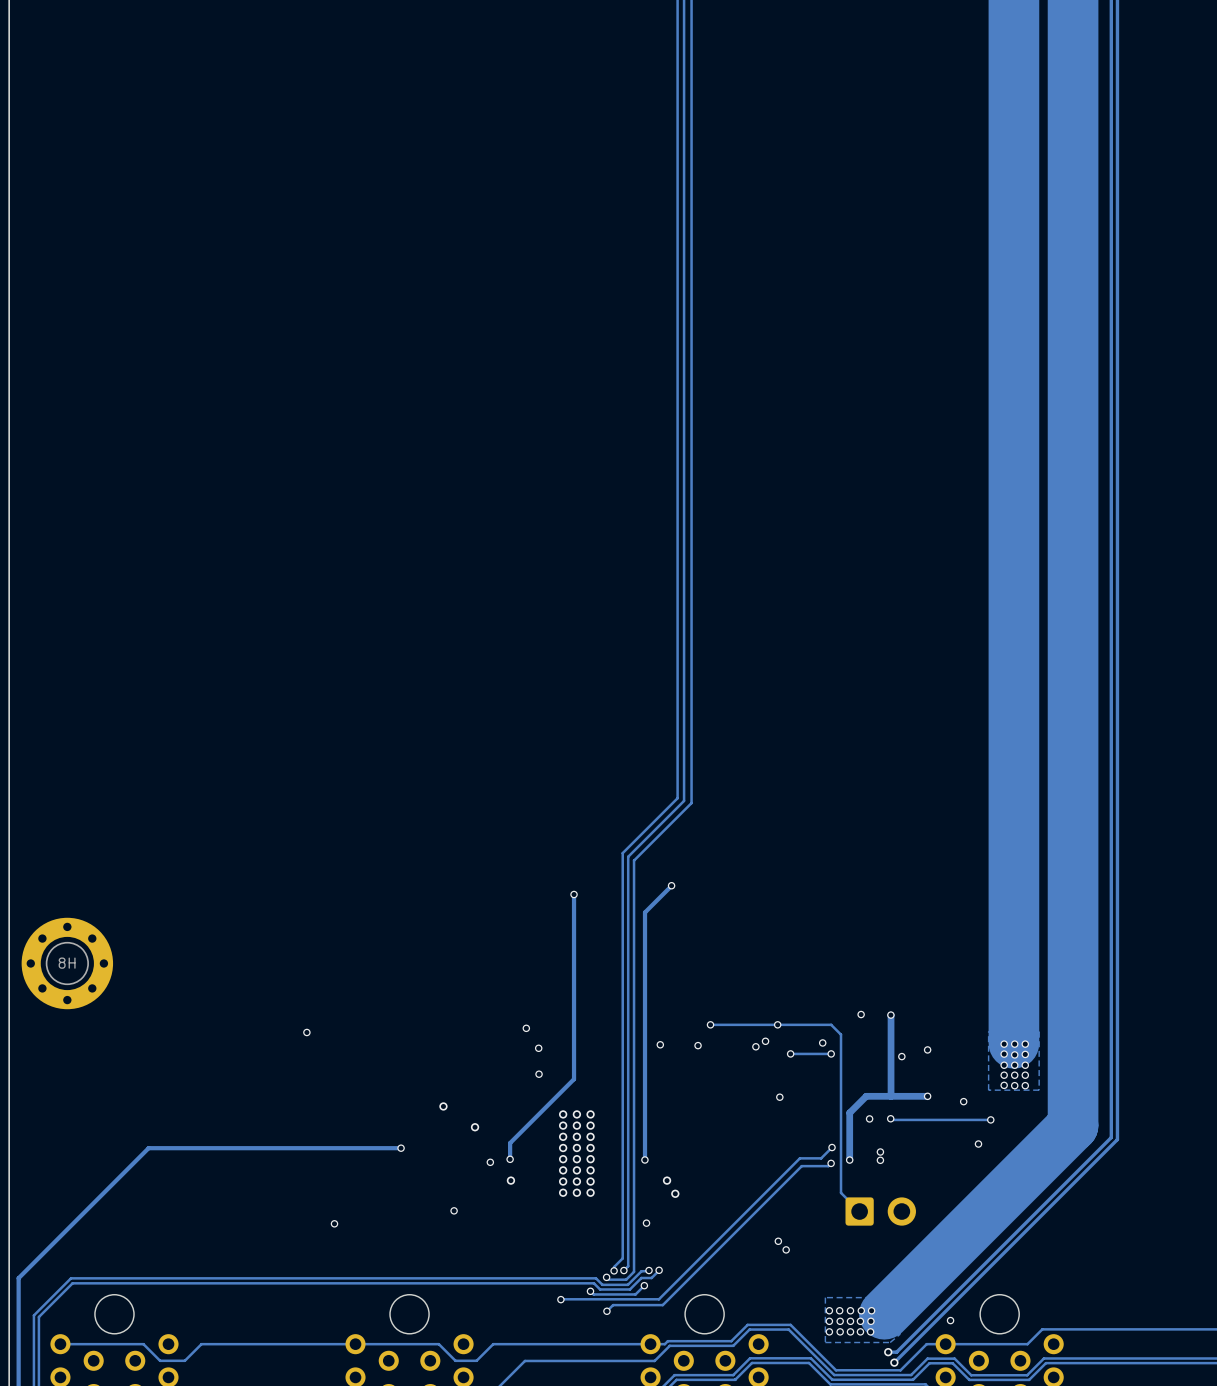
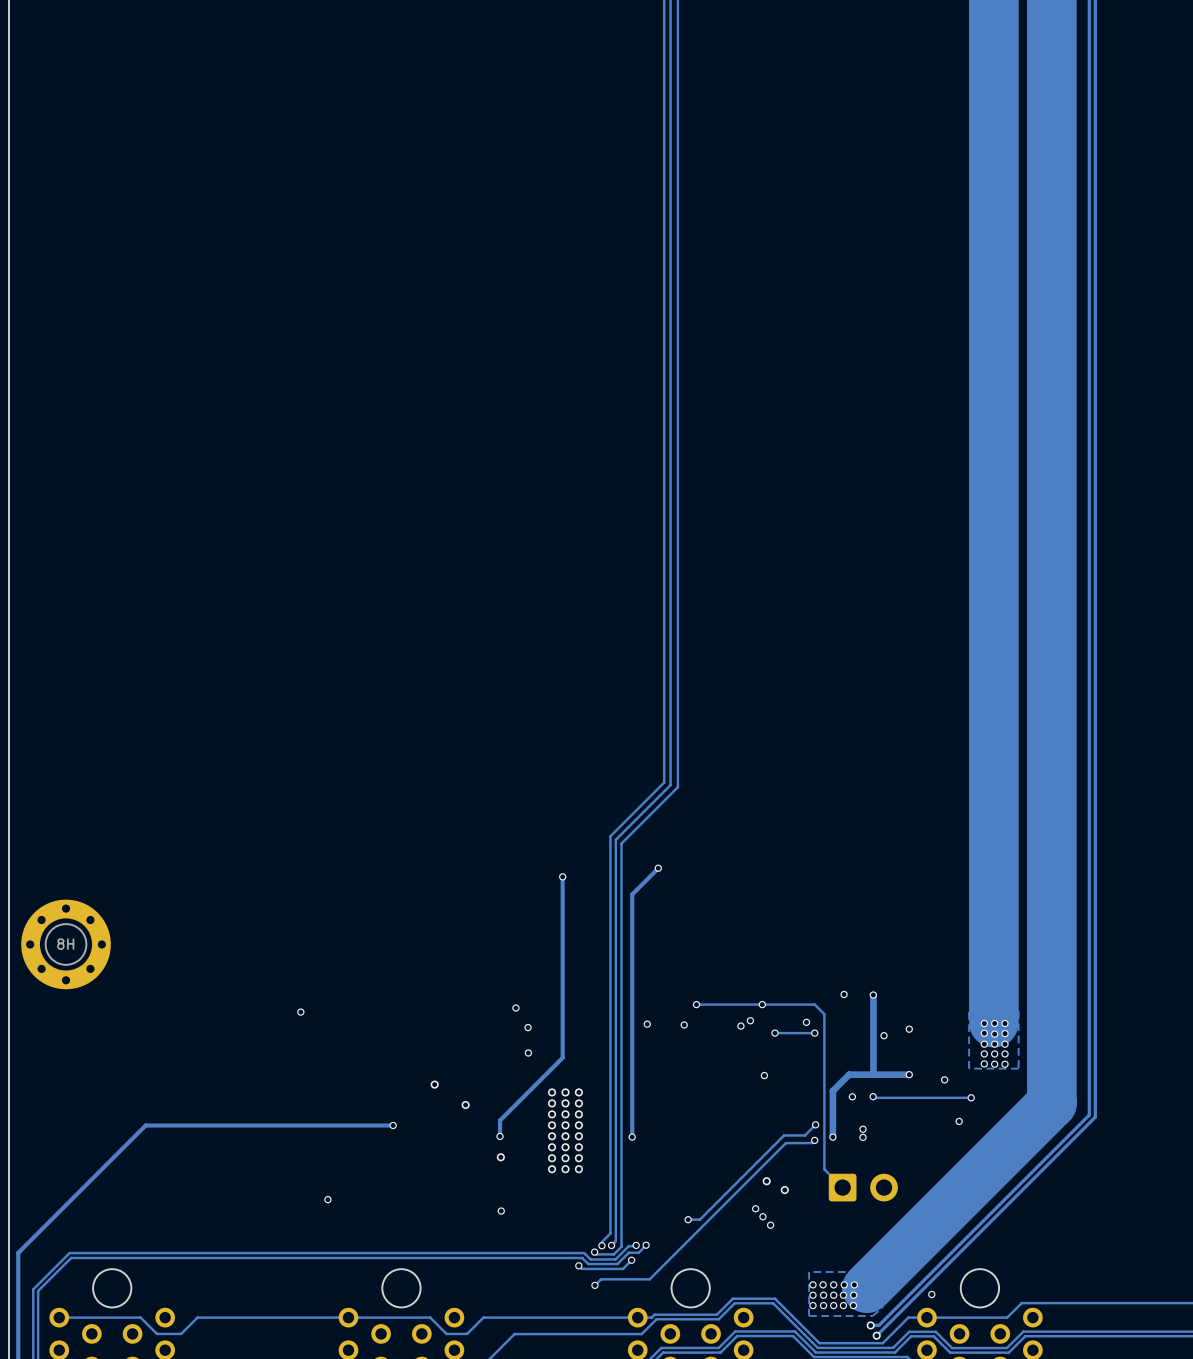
via: (490, 1162) -> none
via: (667, 1180) -> none
via: (675, 1193) -> none
via: none -> (766, 1181)
via: (454, 1210) -> none
via: none -> (784, 1190)
via position: (646, 1223) -> (688, 1219)
via: none -> (755, 1208)
via: none -> (501, 1211)
track: (714, 1244) (658, 1299) (560, 1299) -> (699, 1219) (688, 1219)
via: (560, 1299) -> none

